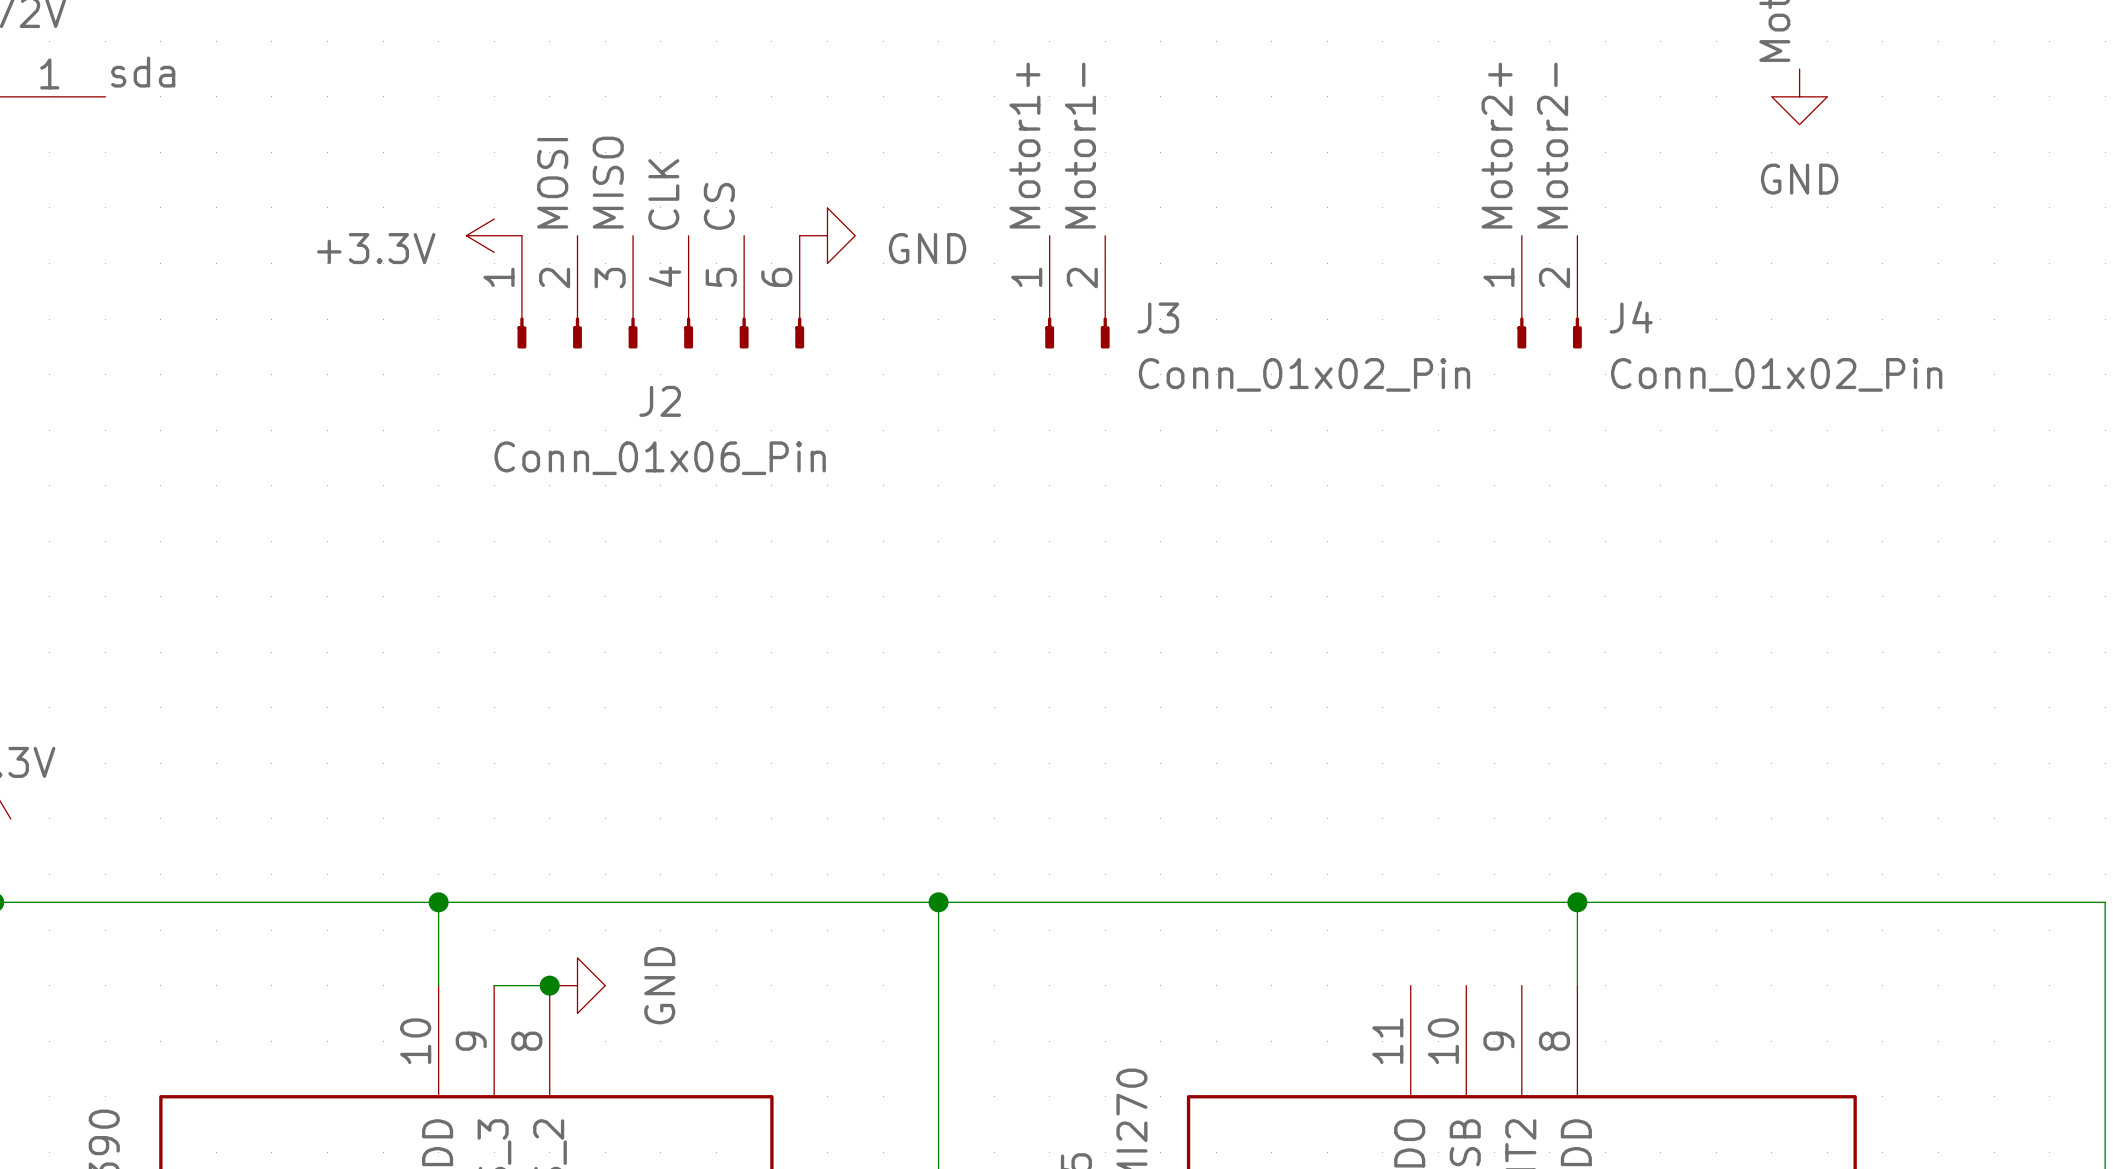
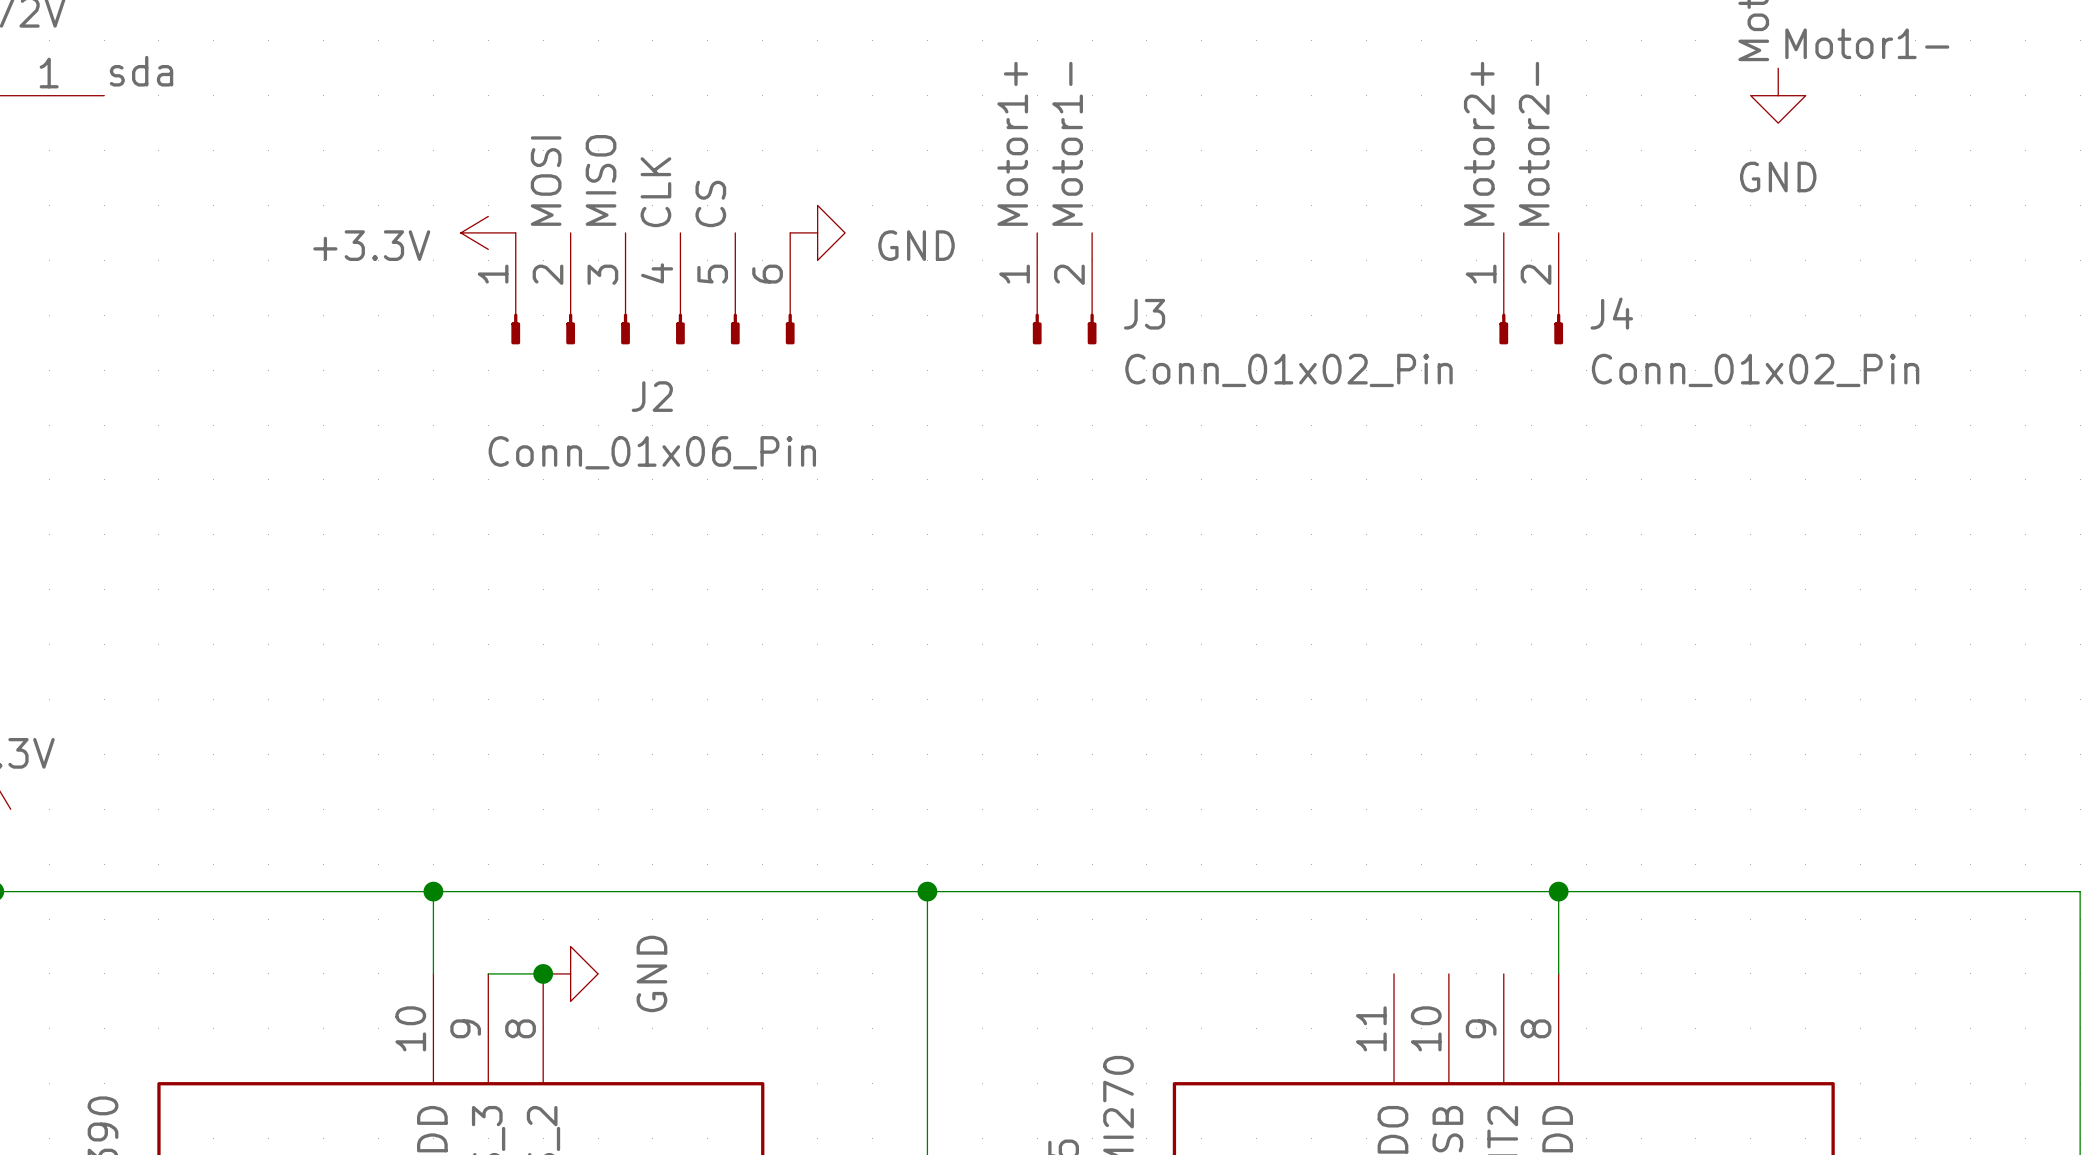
label: none -> Motor1- (1867, 43)

